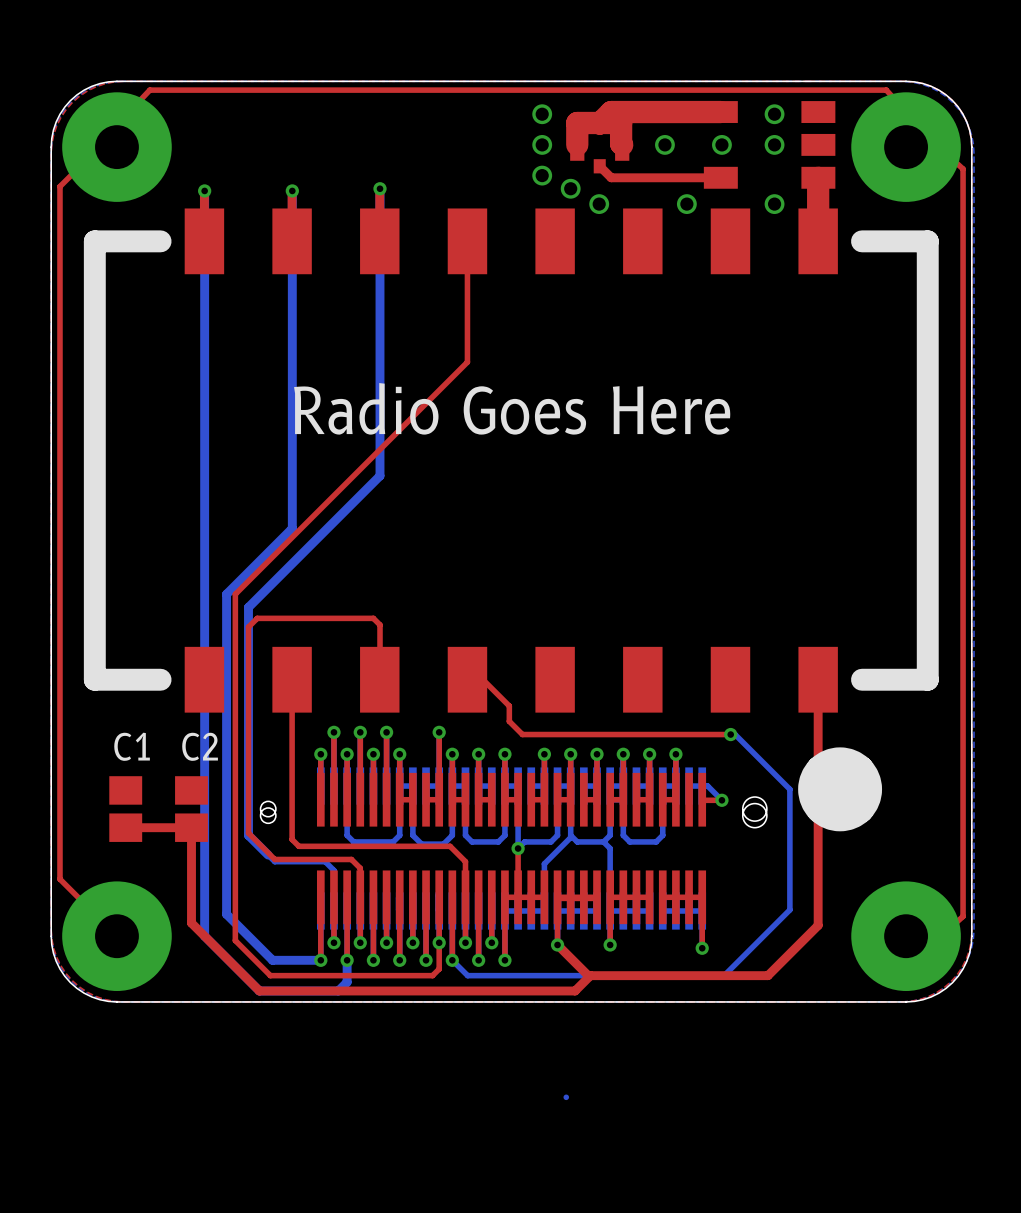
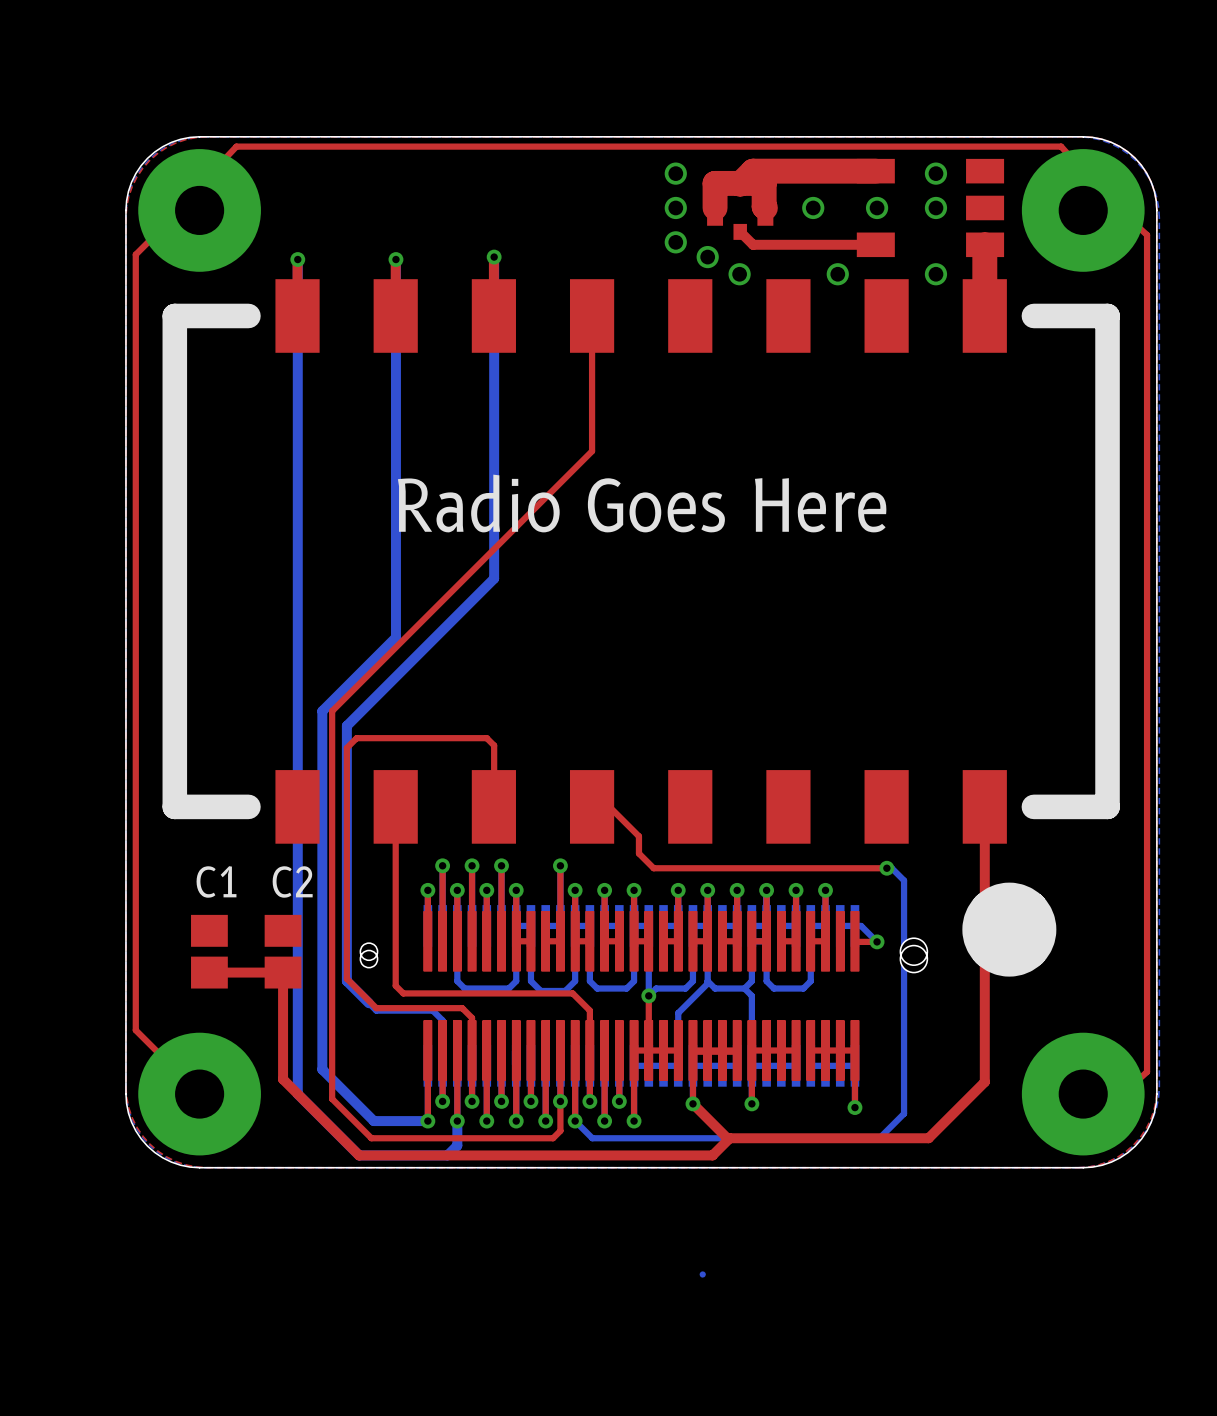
bottom track: (746, 745) (789, 789) (789, 909) (746, 953) -> (904, 880) (904, 1113)
part: none -> (641, 995)

